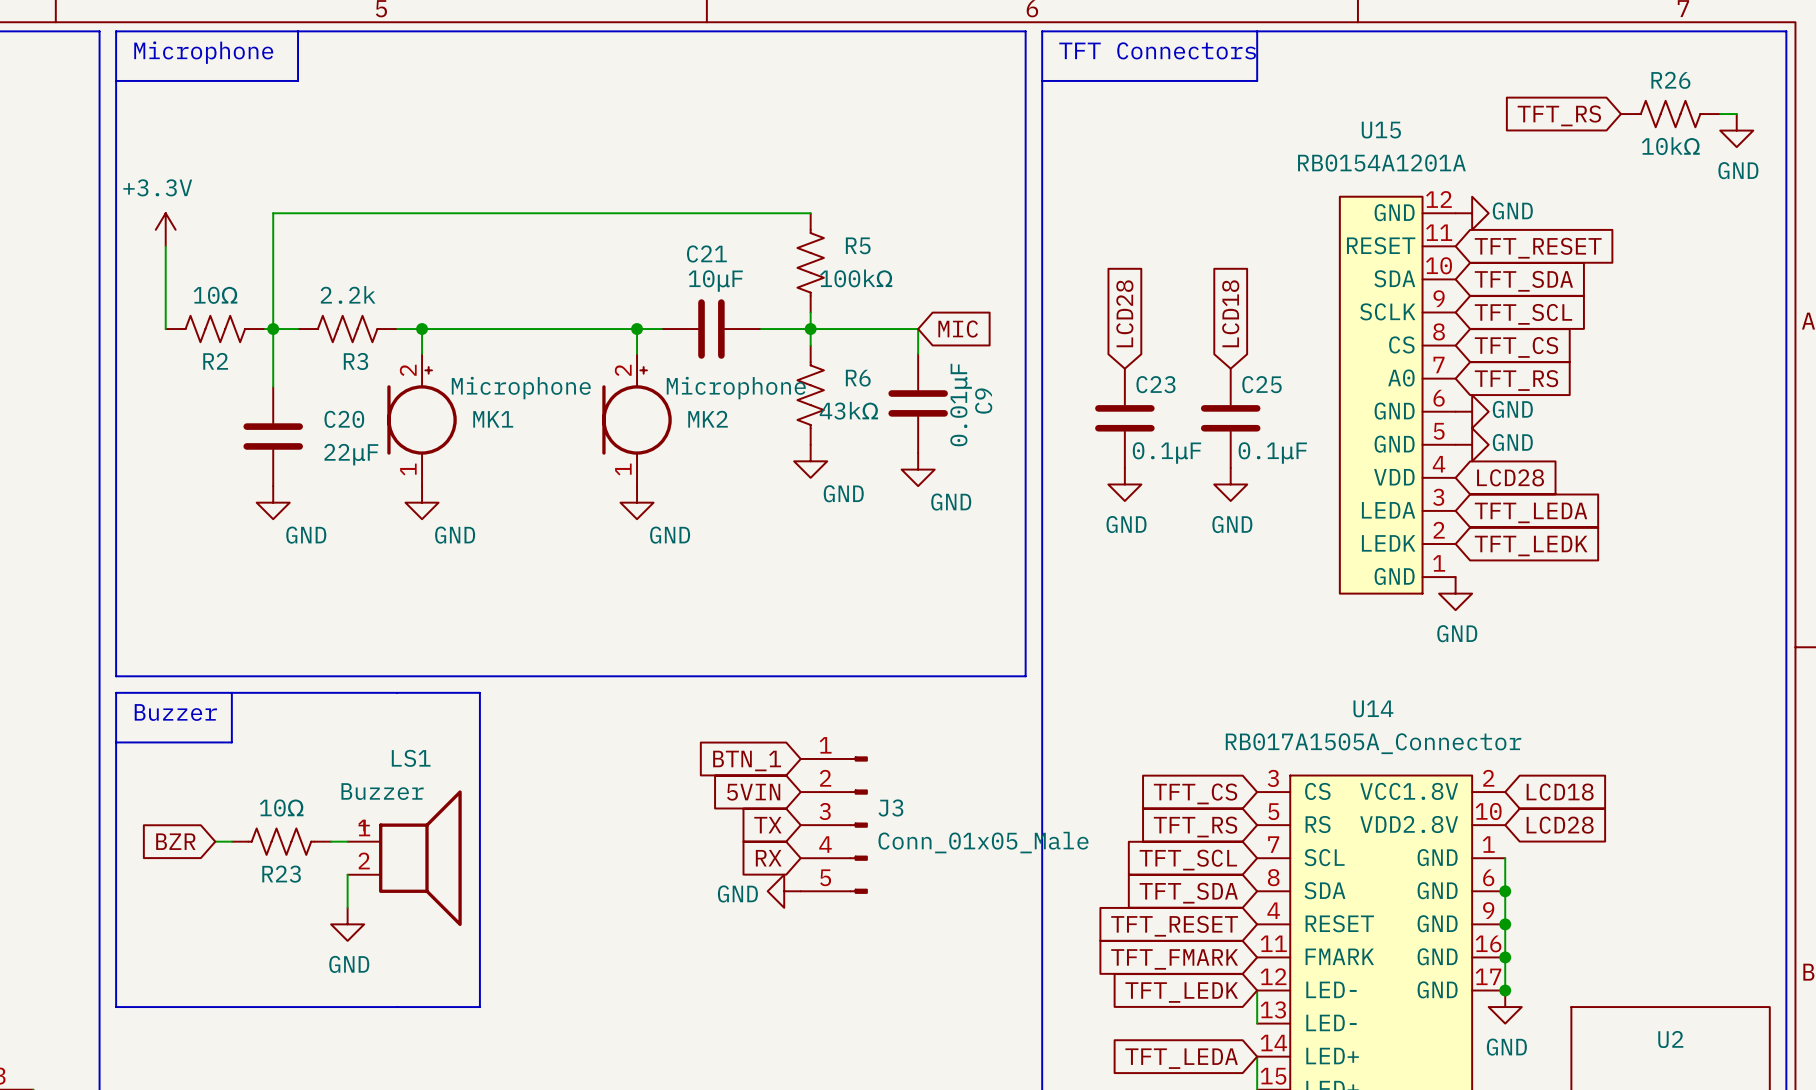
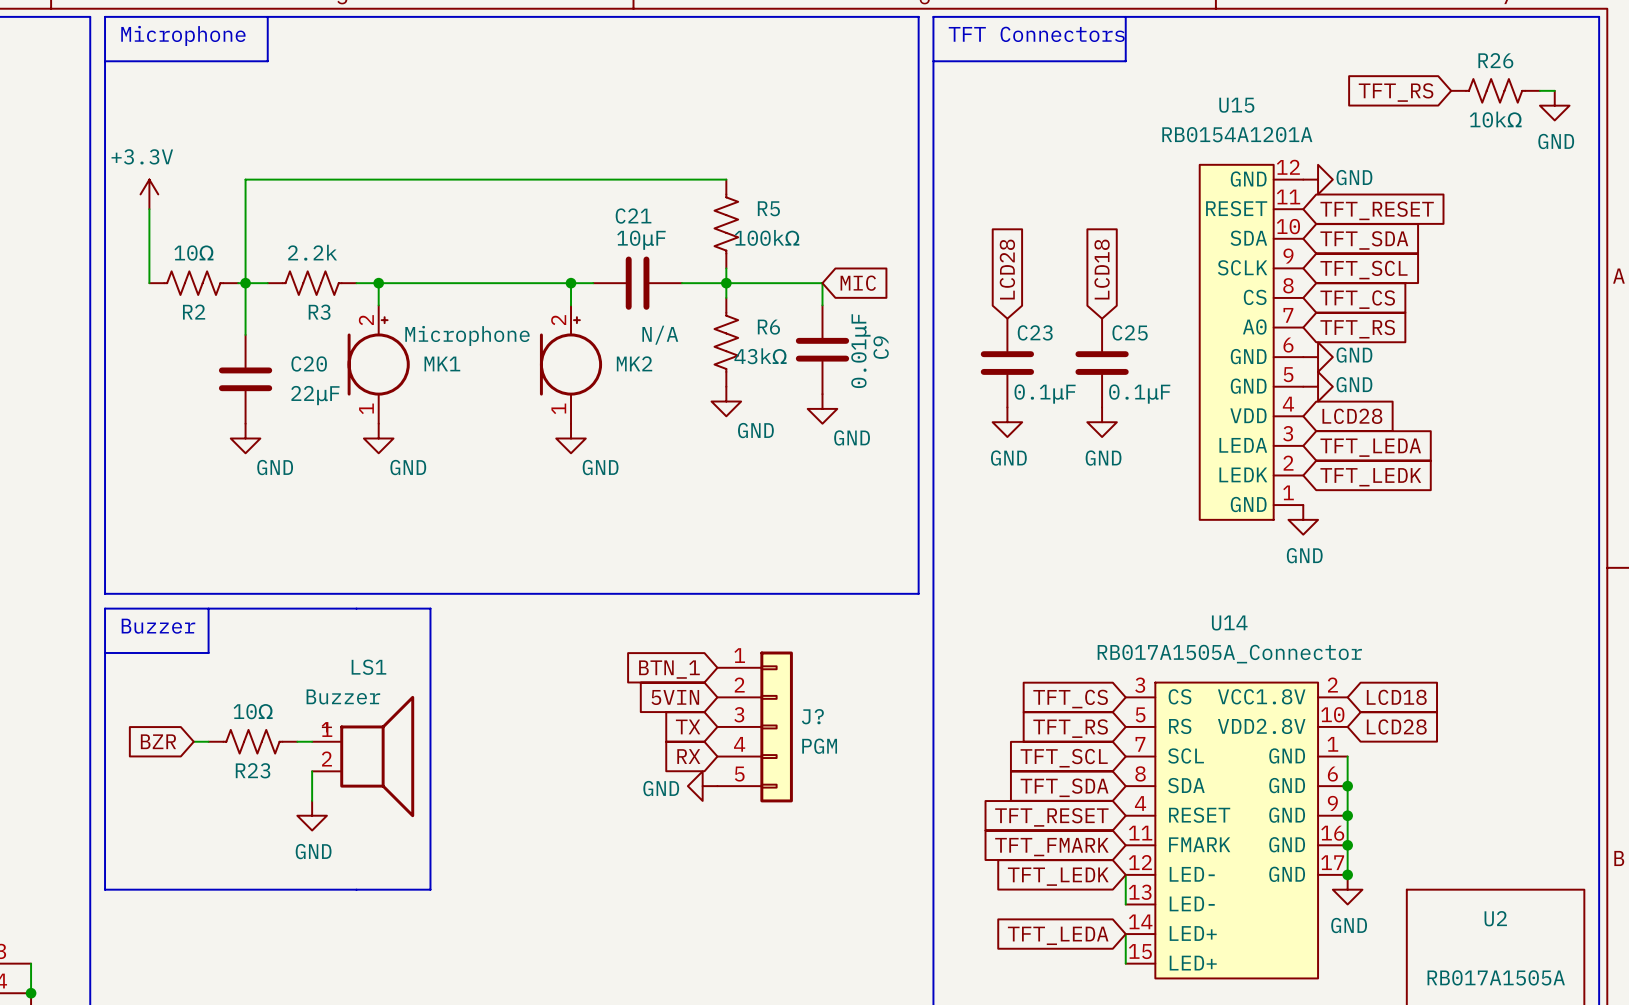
MK2 value: Microphone (736, 388) -> N/A (660, 335)
J3: Conn_01x05_Male (834, 825) -> none
J?: none -> PGM (755, 726)

